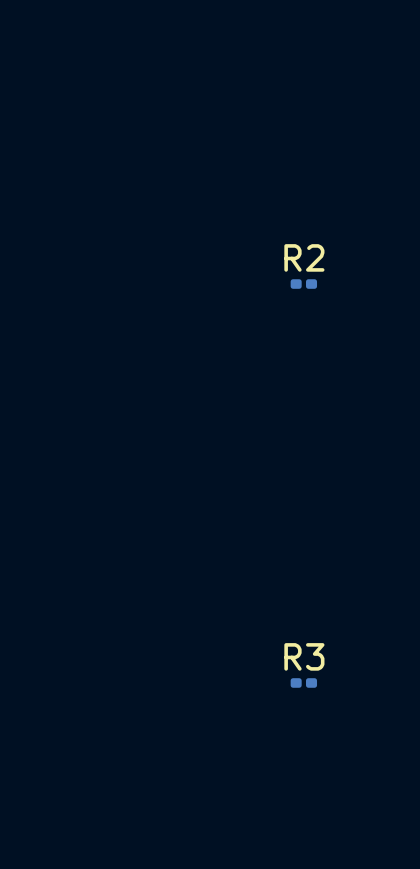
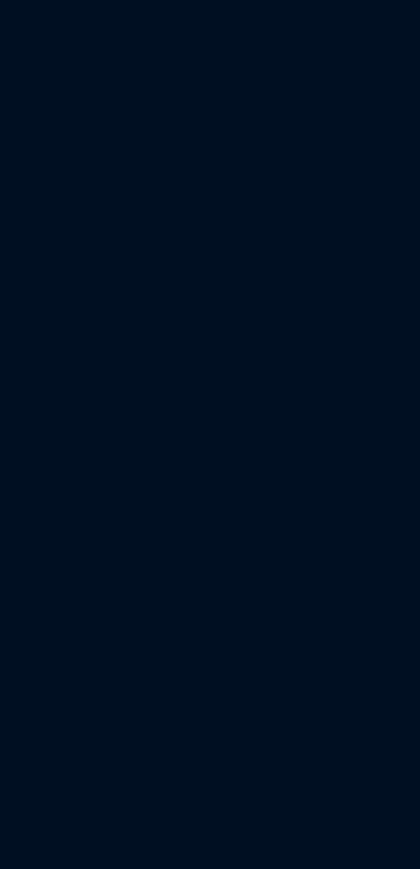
R2: (303, 284) -> none
R3: (303, 682) -> none

